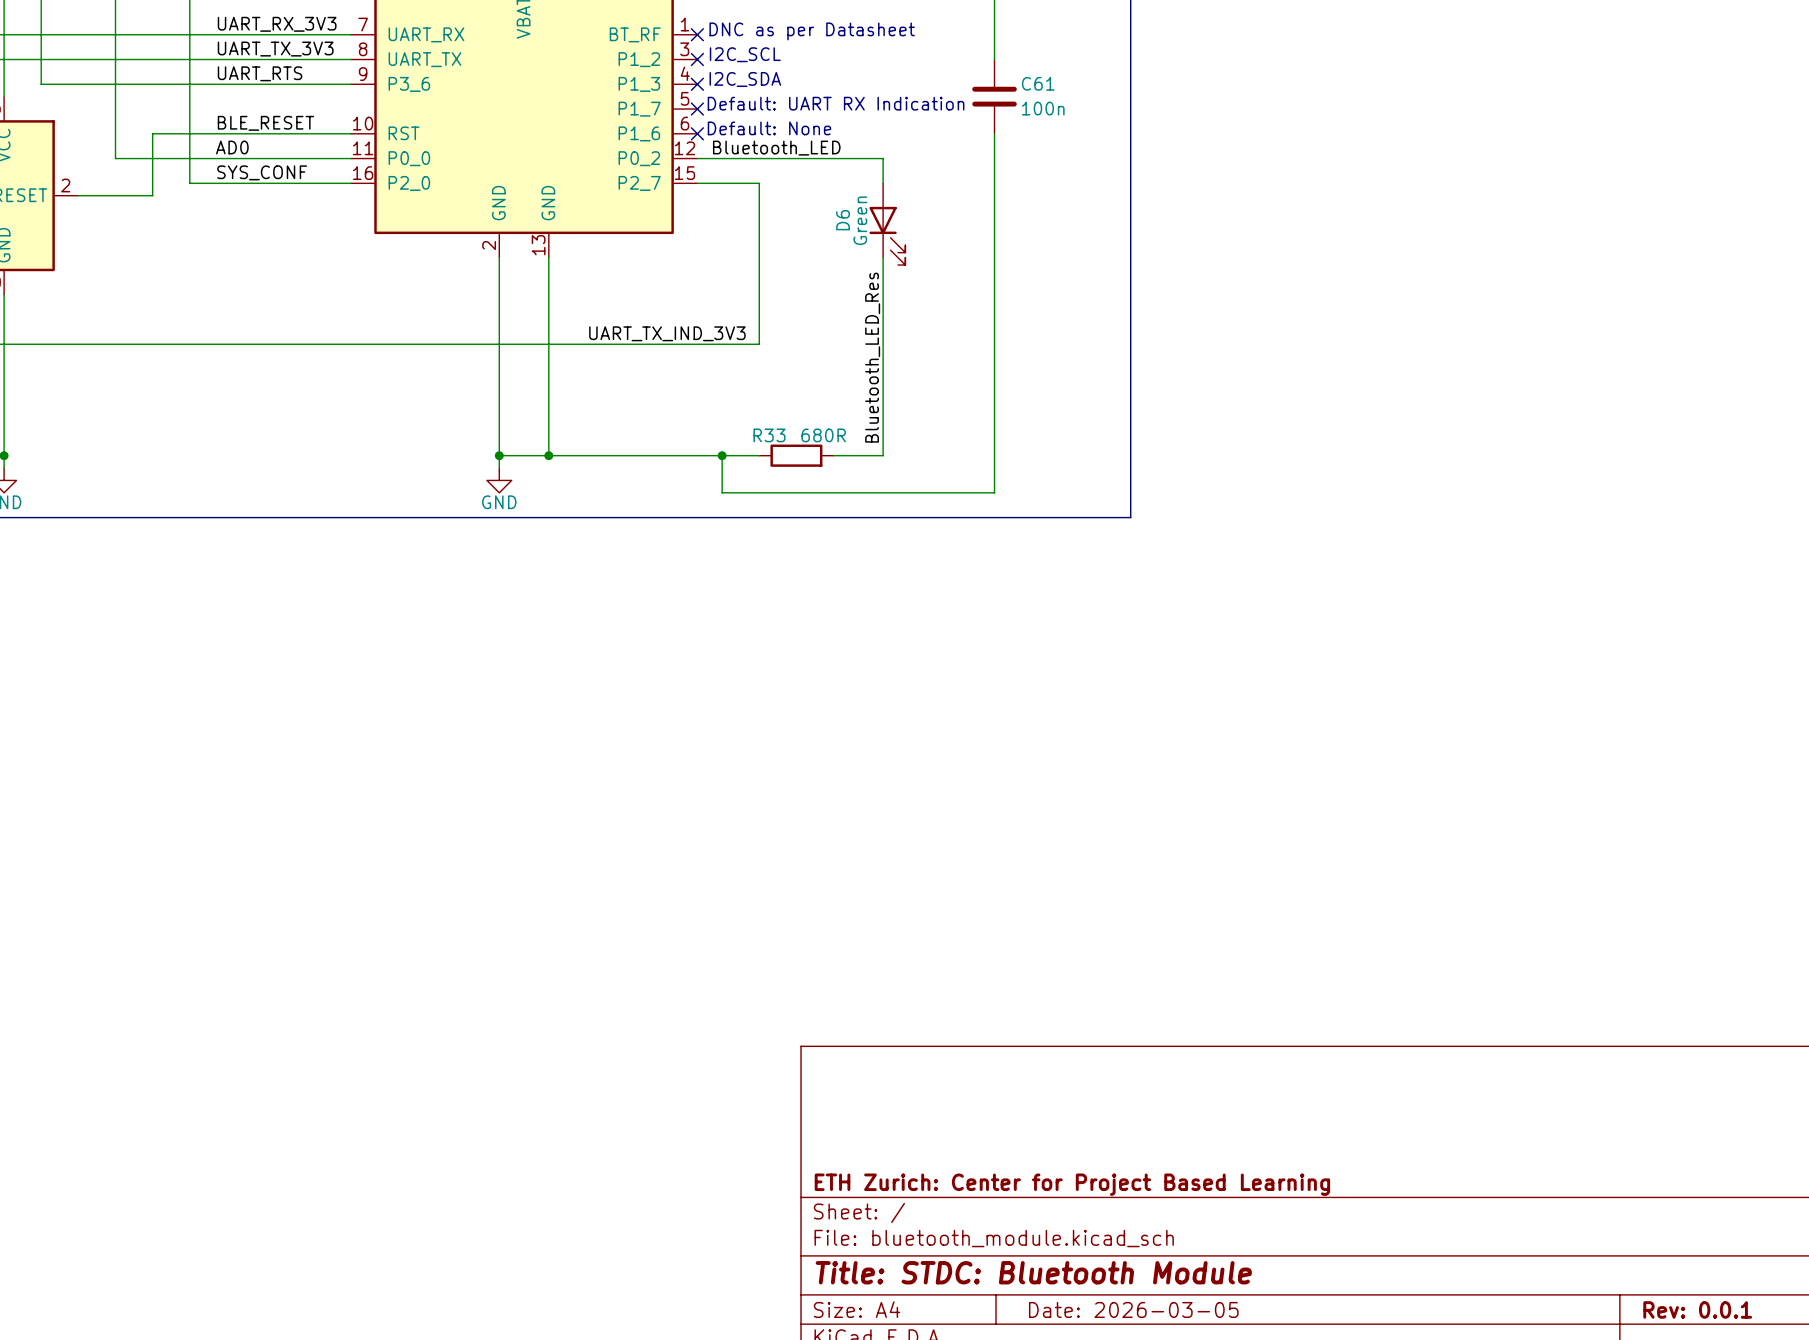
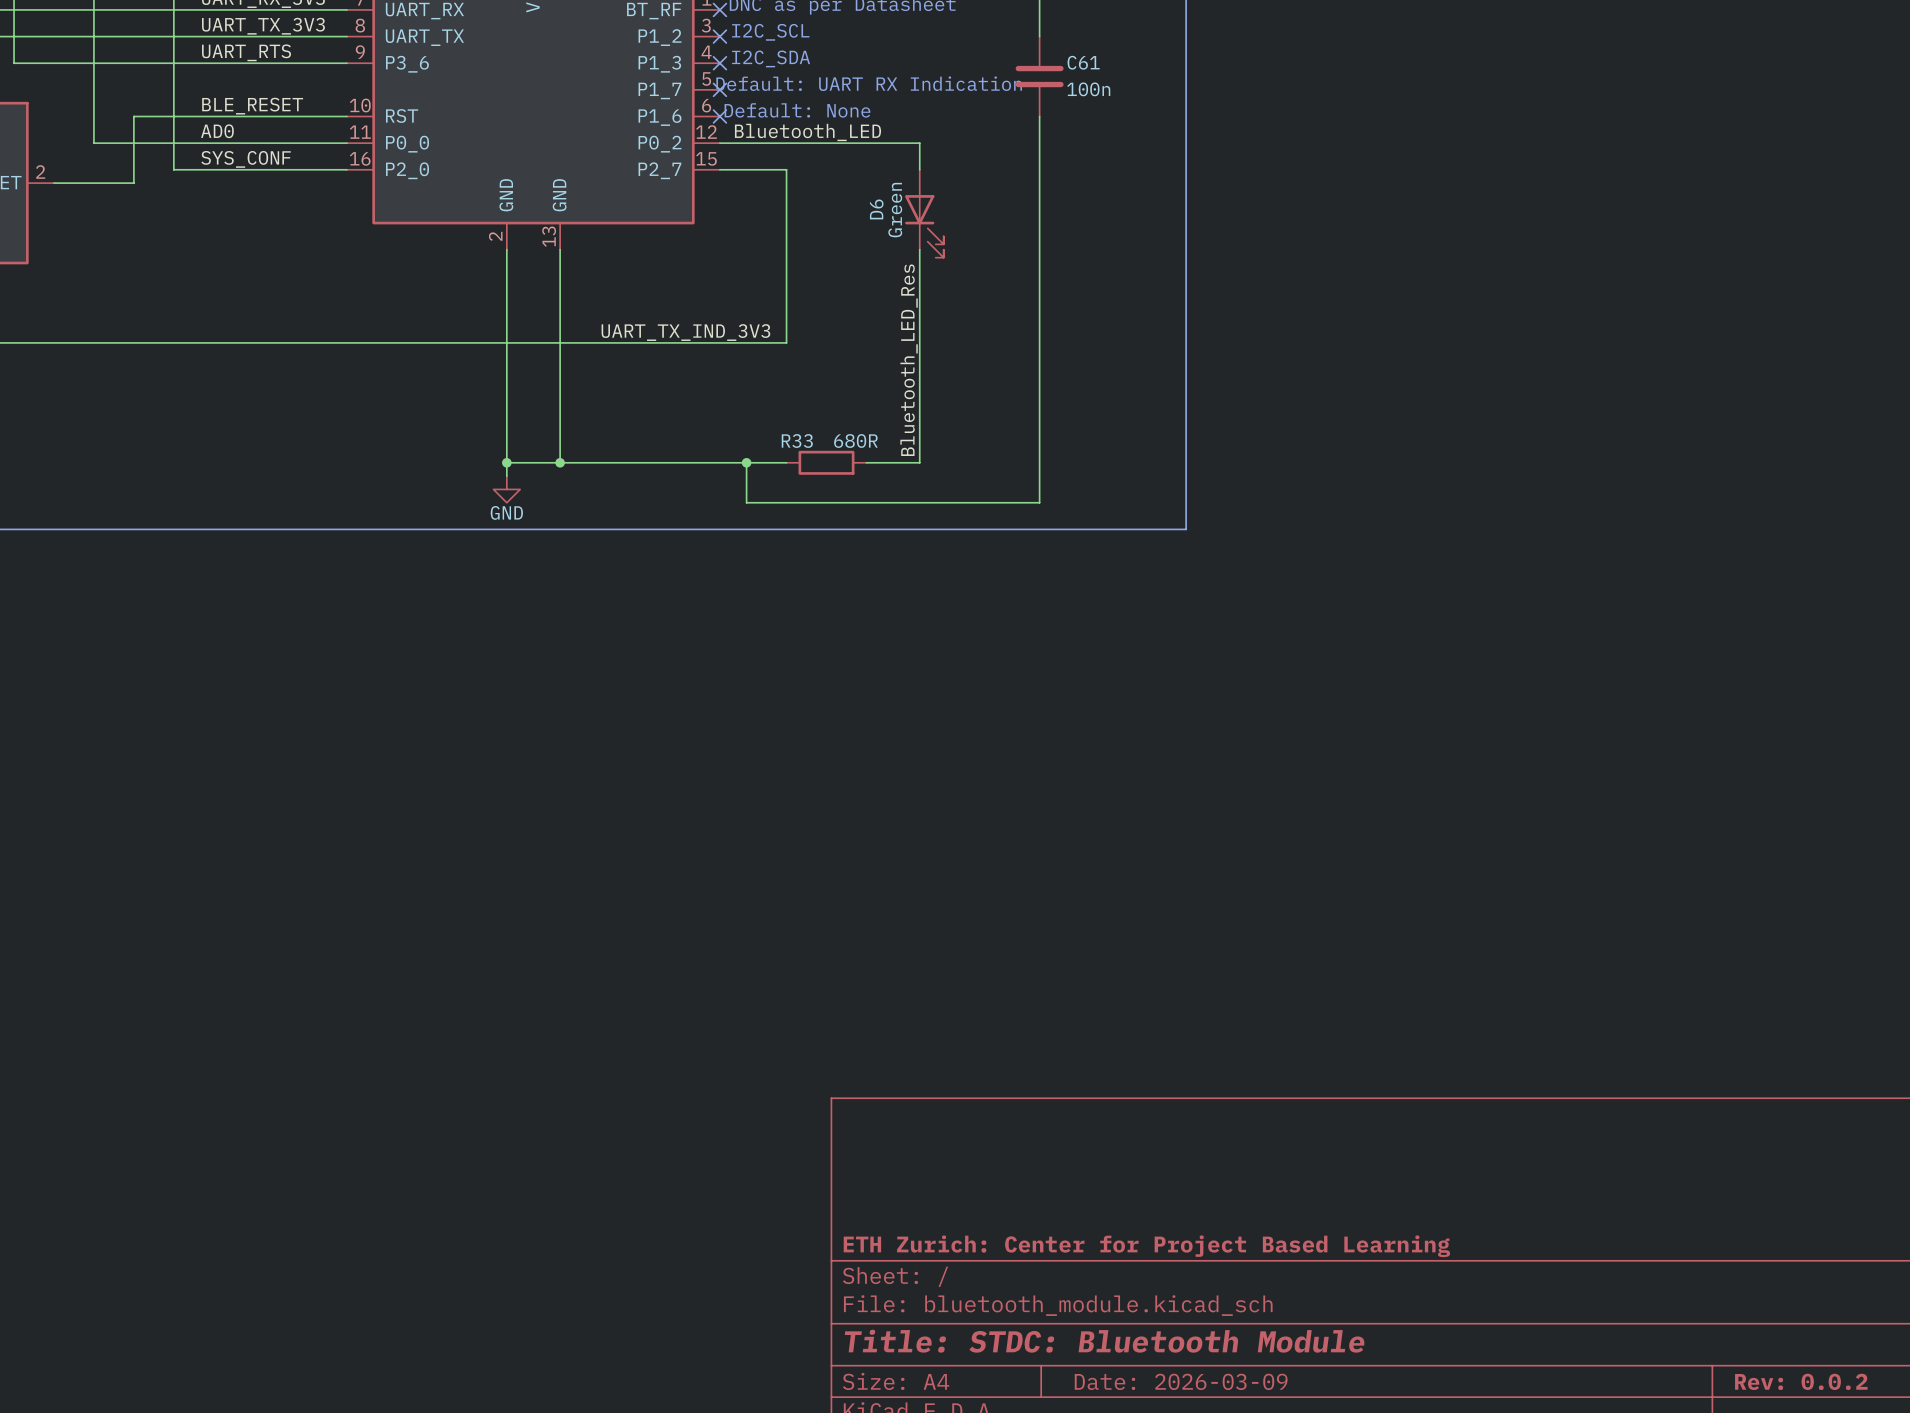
title block: Date: 2026-03-05 (1133, 1309) -> Date: 2026-03-09 (1181, 1381)
title block: Rev: 0.0.1 (1697, 1309) -> Rev: 0.0.2 (1801, 1381)

